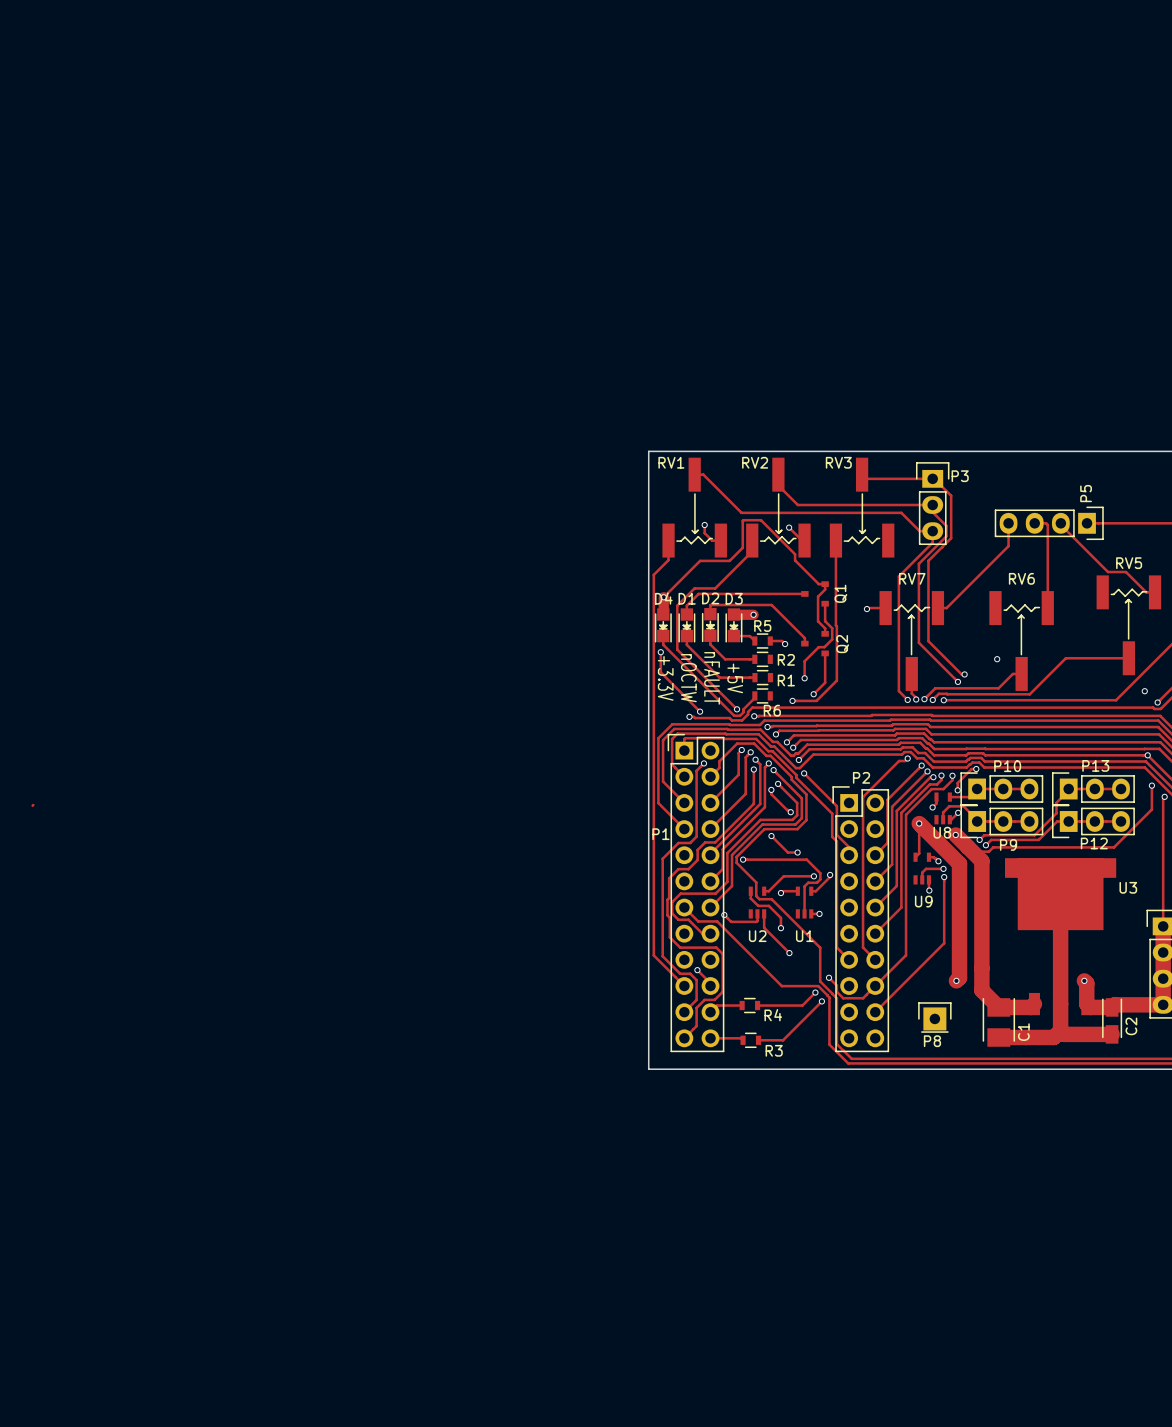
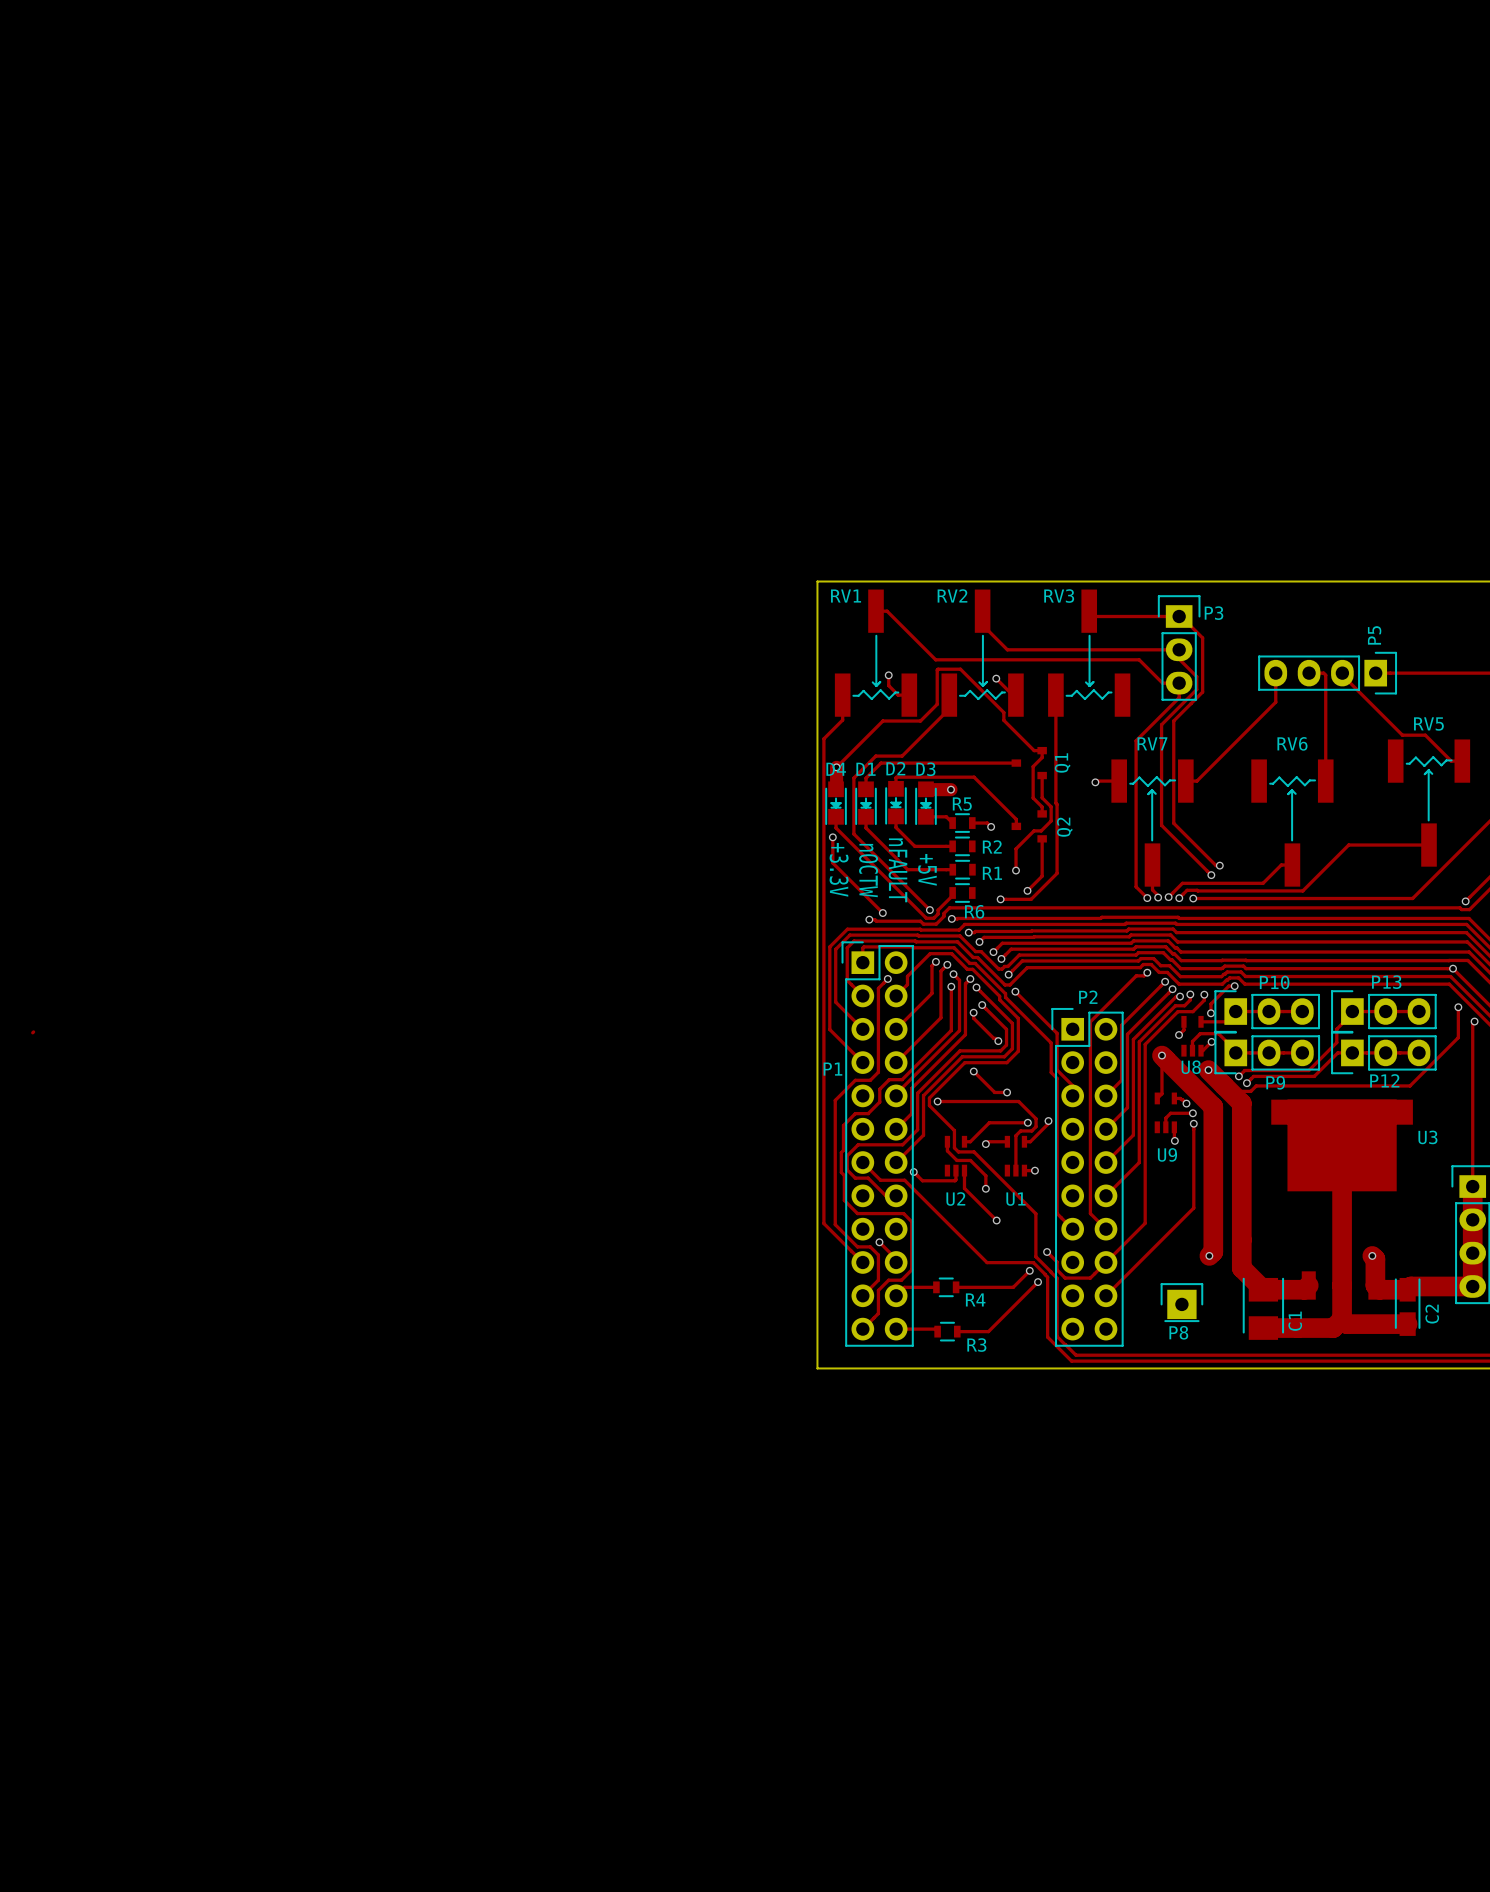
via: (997, 659) -> none
via: (1144, 691) -> none

